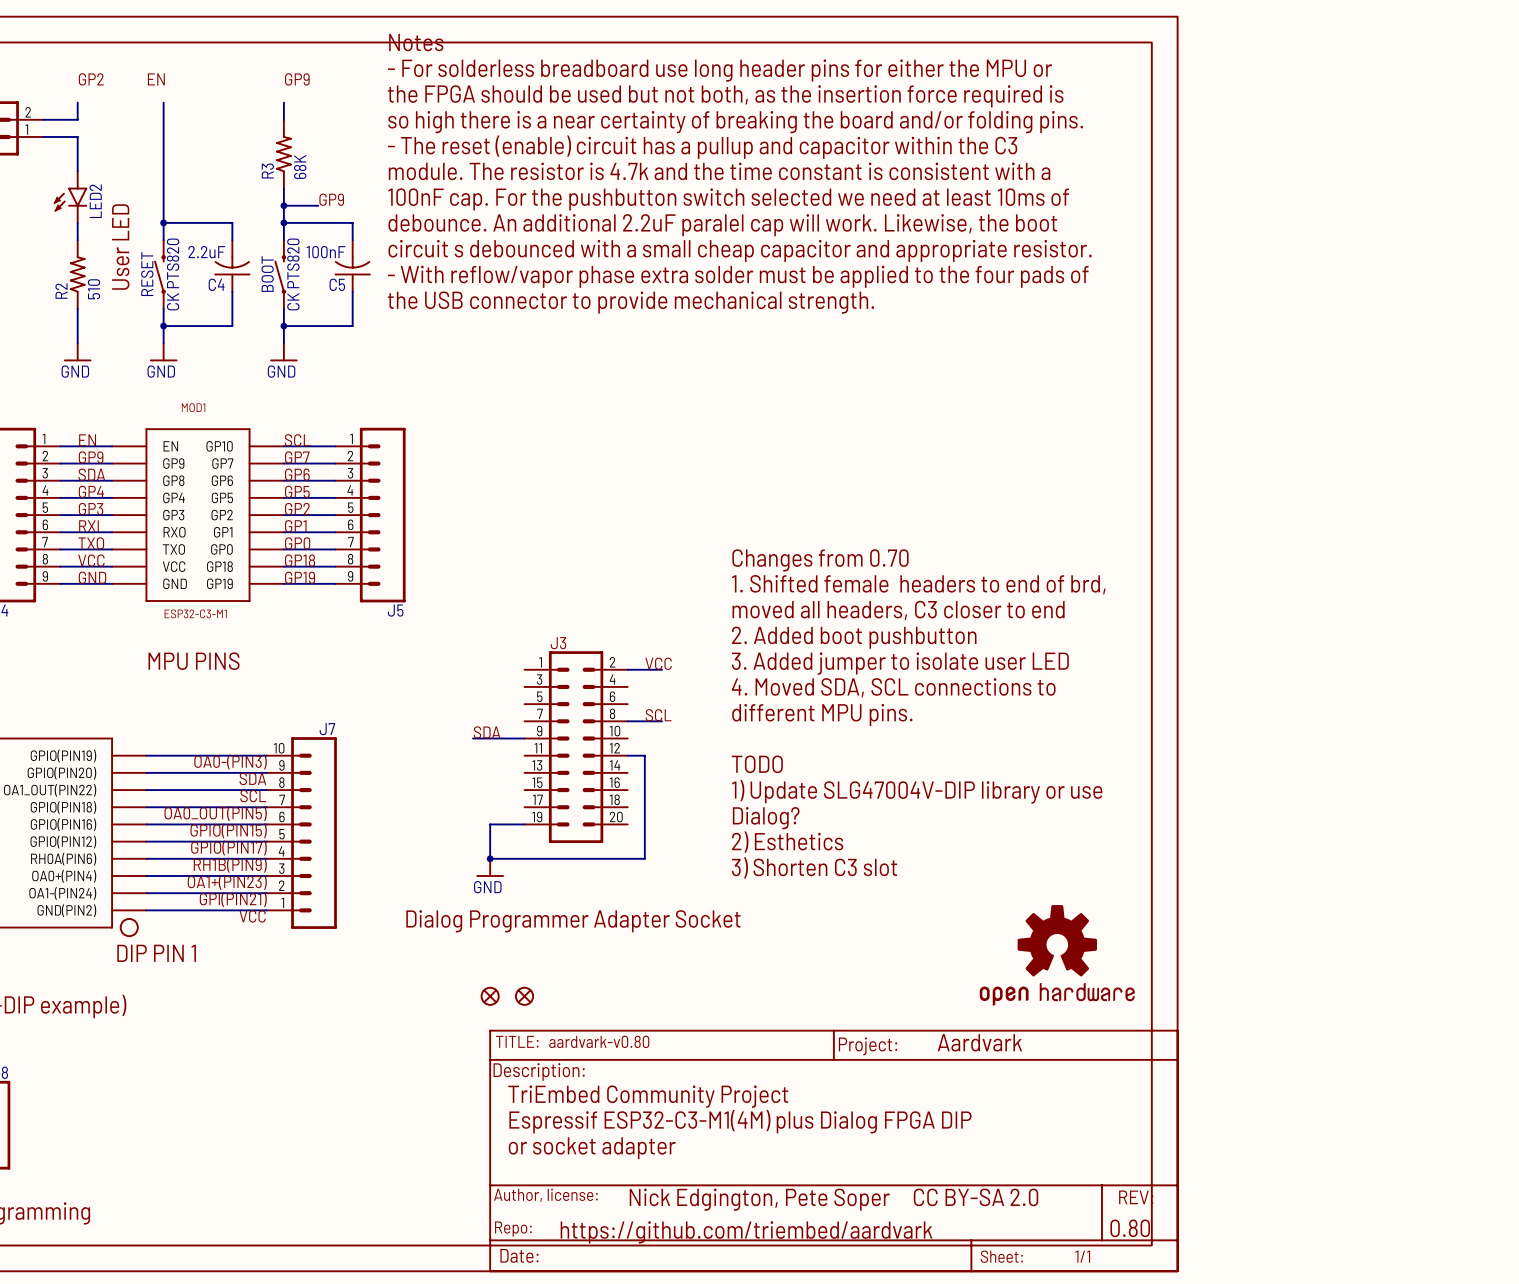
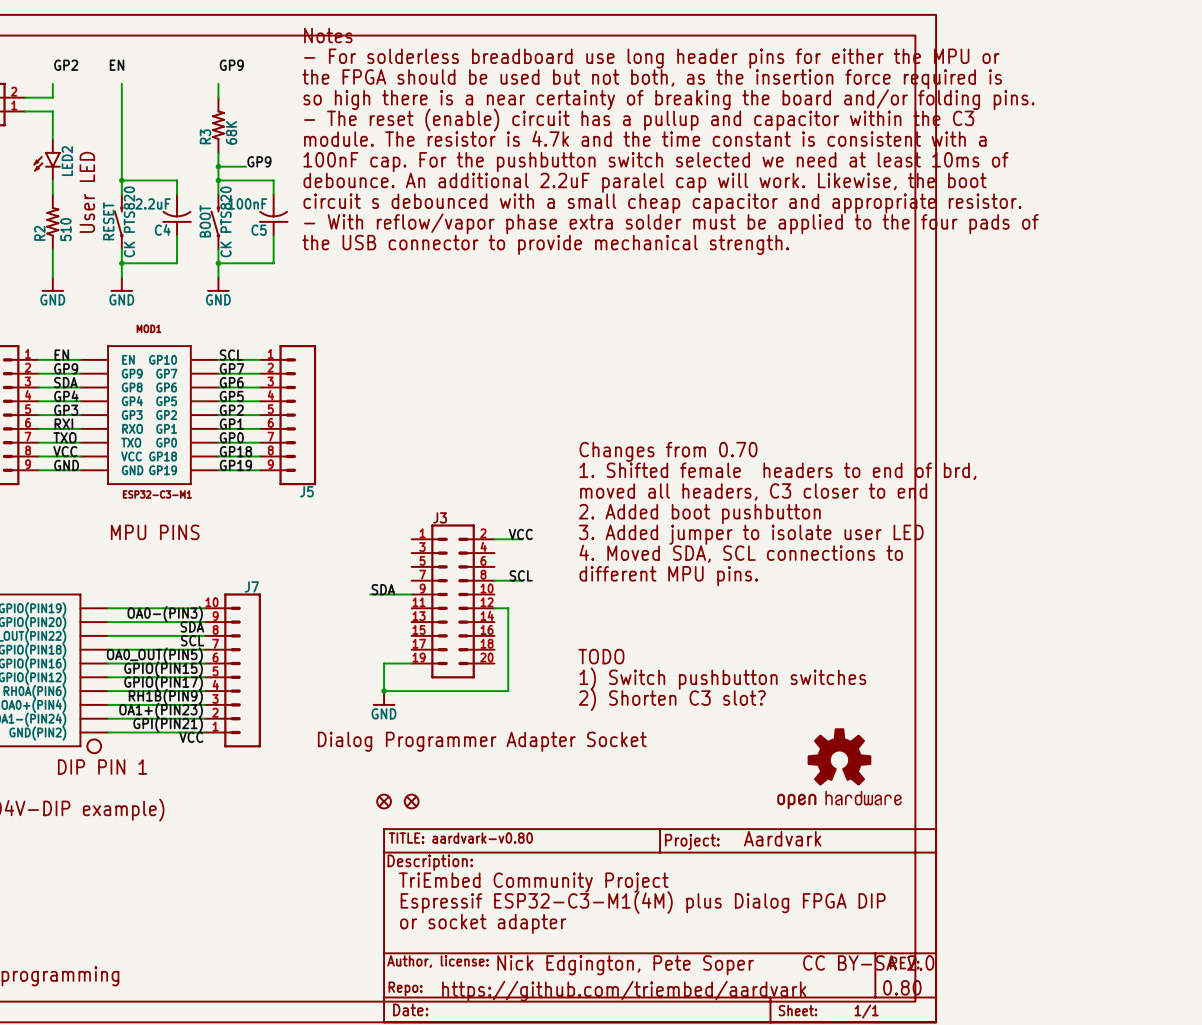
text: TODO (757, 764) -> none
text: 1) Update SLG47004V-DIP library or use (917, 791) -> none
text: Dialog? (766, 818) -> TODO (601, 656)
text: 2) Esthetics (787, 842) -> 1) Switch pushbutton switches (722, 678)
text: 3) Shorten C3 slot (814, 867) -> 2) Shorten C3 slot? (672, 699)

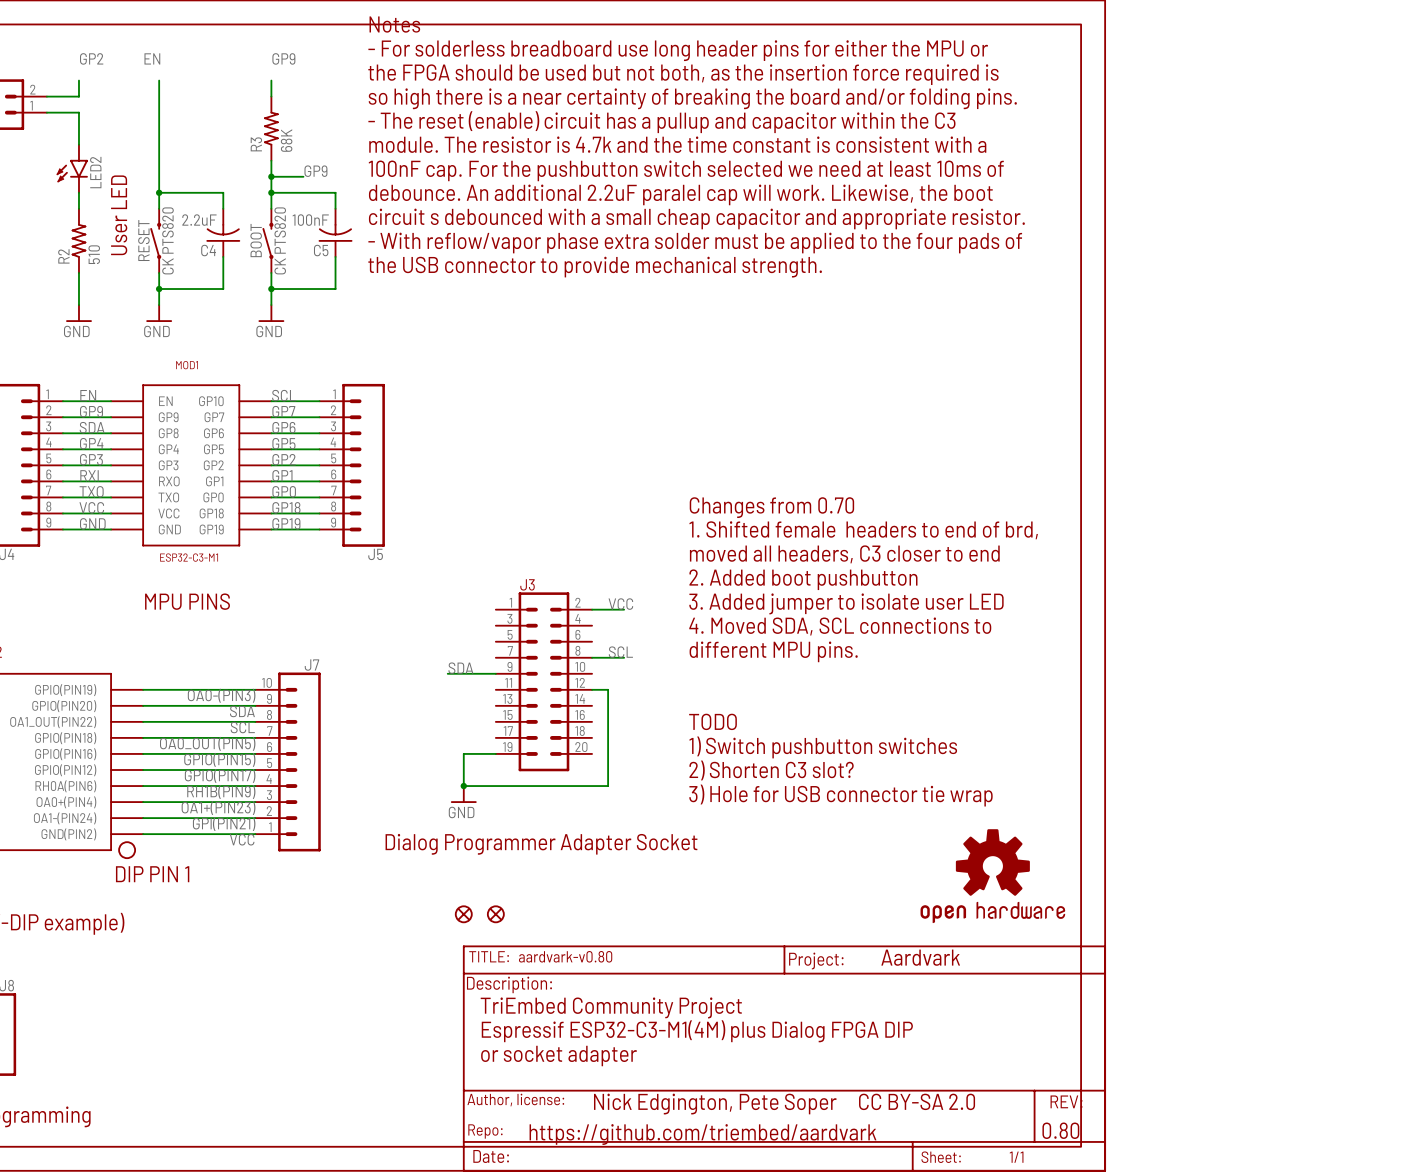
text: none -> TODO (713, 721)
text: TODO (601, 656) -> 1) Switch pushbutton switches (823, 747)
text: 1) Switch pushbutton switches (722, 678) -> 2) Shorten C3 slot? (771, 770)
text: 2) Shorten C3 slot? (672, 699) -> 3) Hole for USB connector tie wrap (840, 795)

